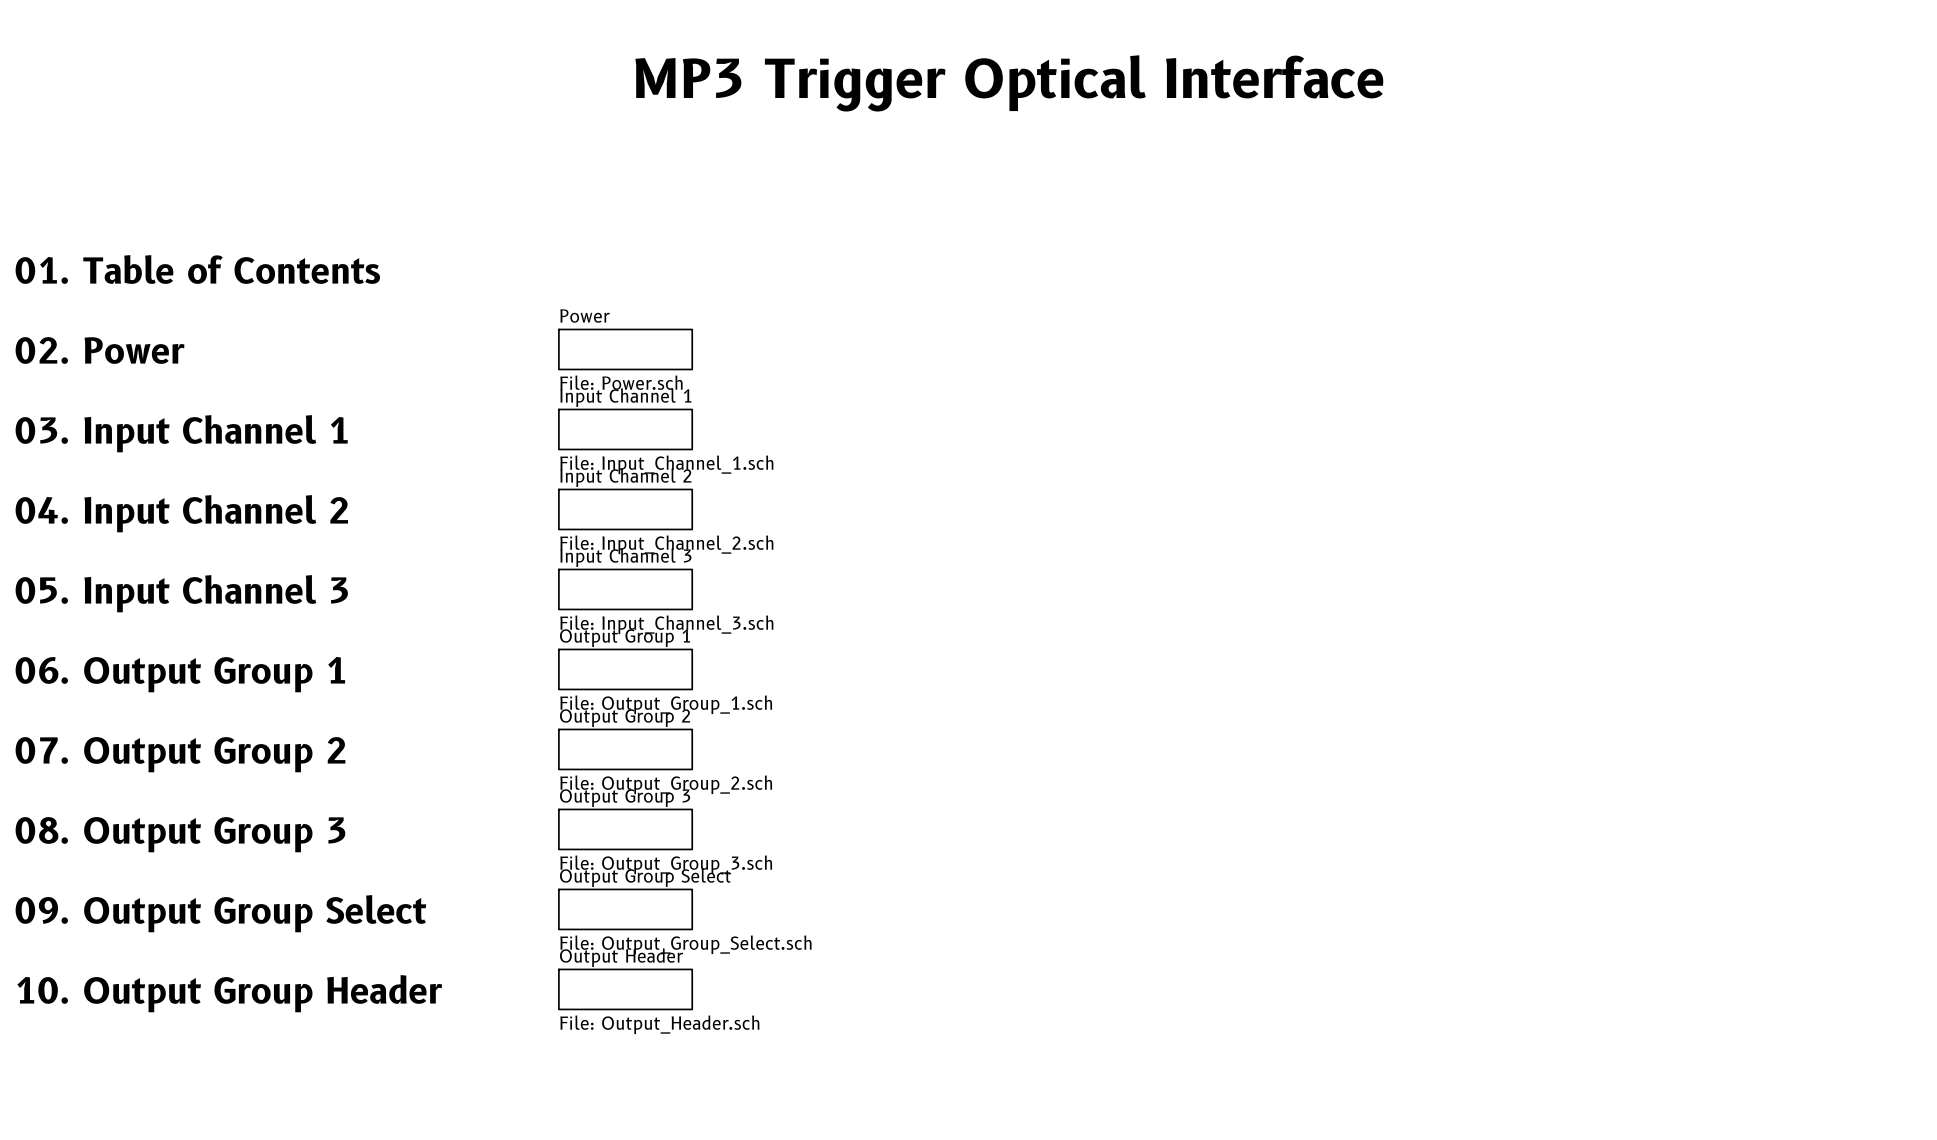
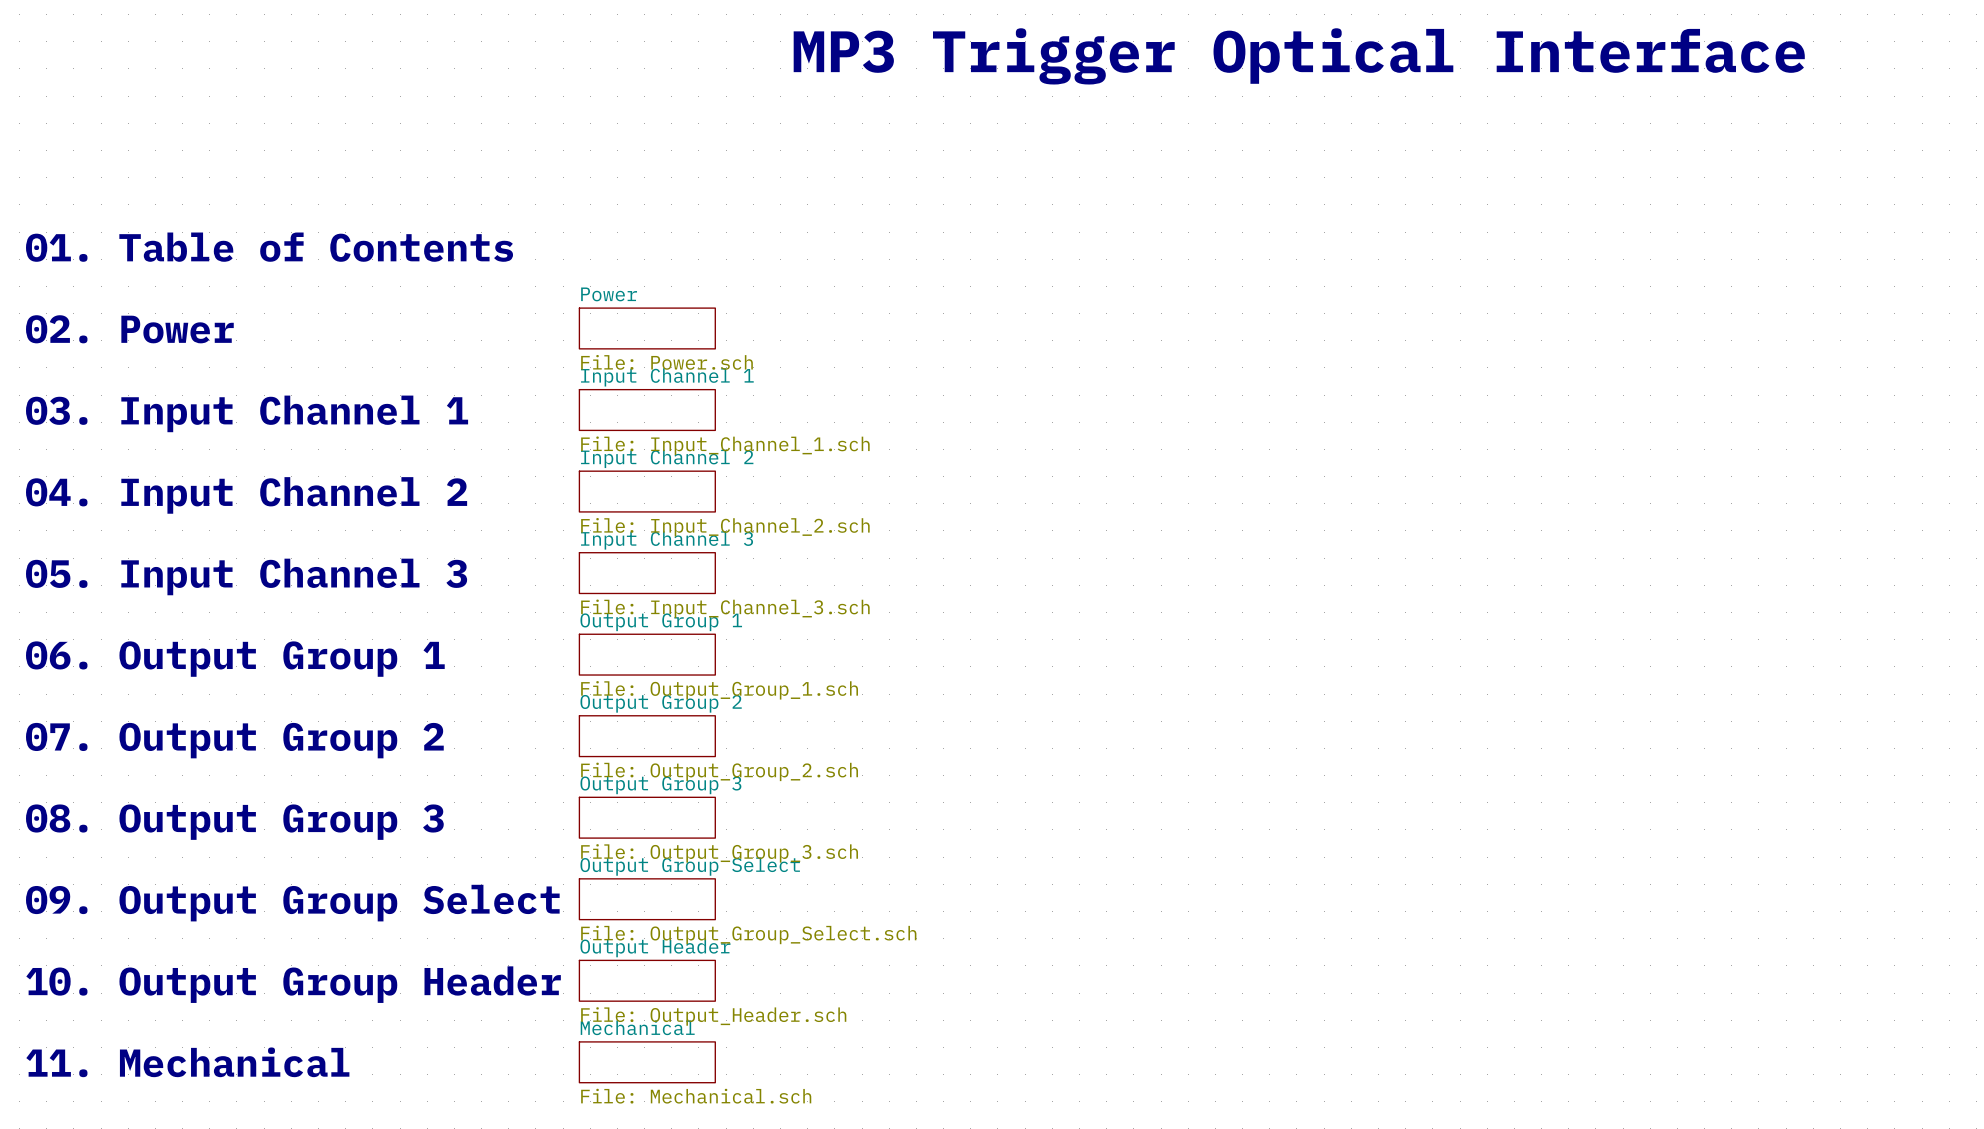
text position: MP3 Trigger Optical Interface (1009, 83) -> MP3 Trigger Optical Interface (1299, 56)
text: none -> 11. Mechanical (187, 1062)
sheet Mechanical: none -> File: Mechanical.sch (647, 1062)

